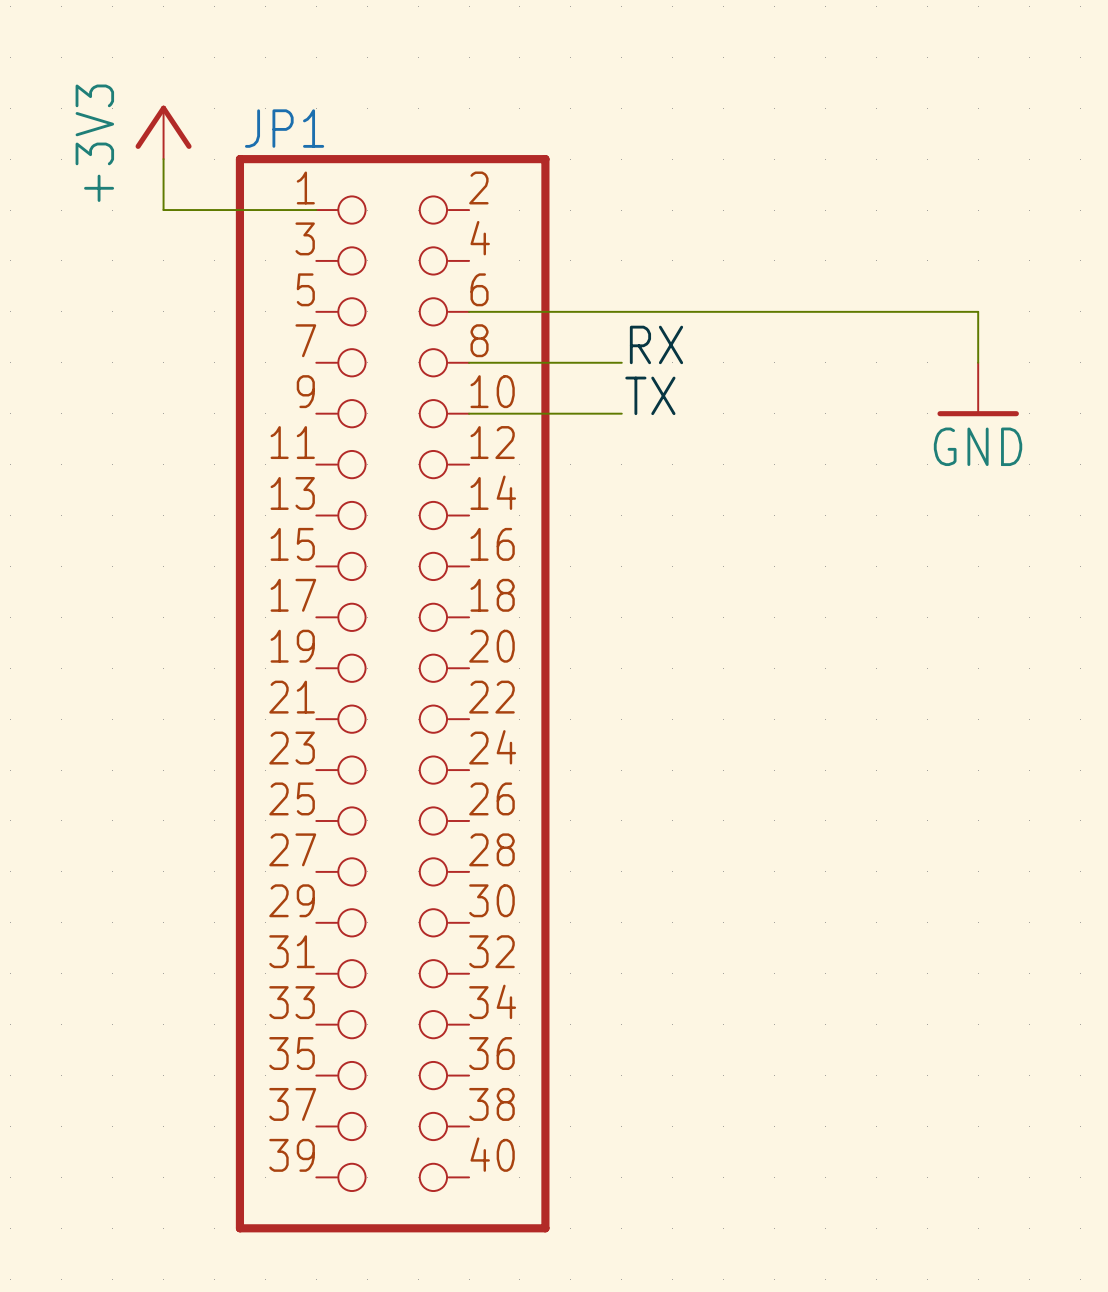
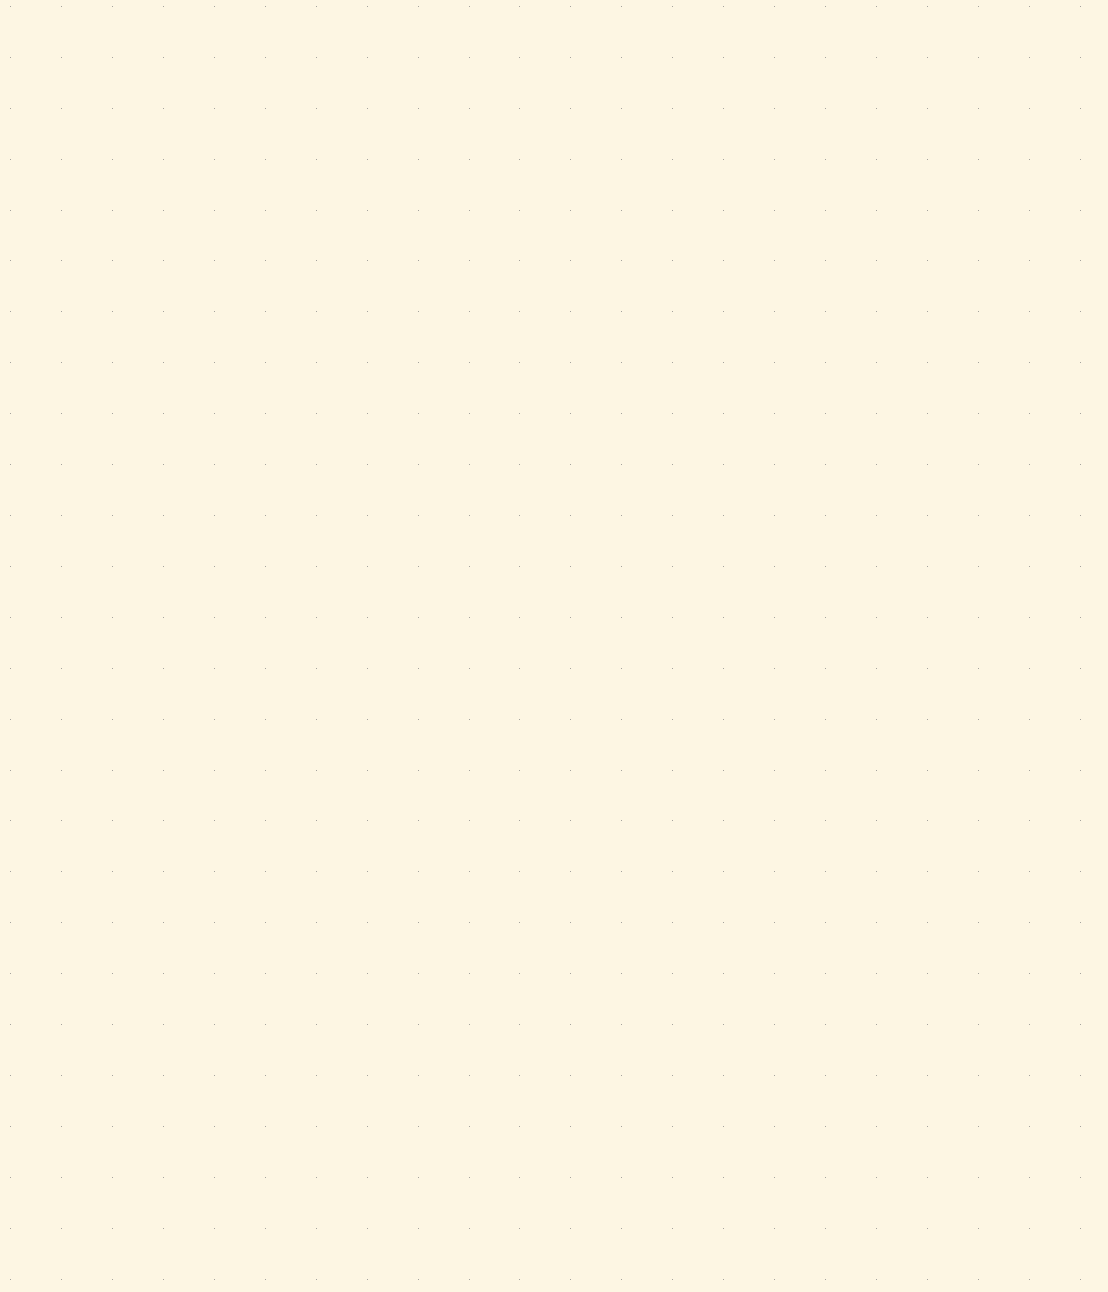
power symbol: +3V3 (163, 132) -> none
wire: (163, 159) (163, 210) (316, 210) -> none
wire: (469, 311) (978, 311) (978, 362) -> none
label: RX (656, 344) -> none
wire: (469, 362) (621, 362) -> none
power symbol: GND (978, 389) -> none
label: TX (650, 395) -> none
wire: (469, 413) (621, 413) -> none
JP1: (392, 693) -> none

